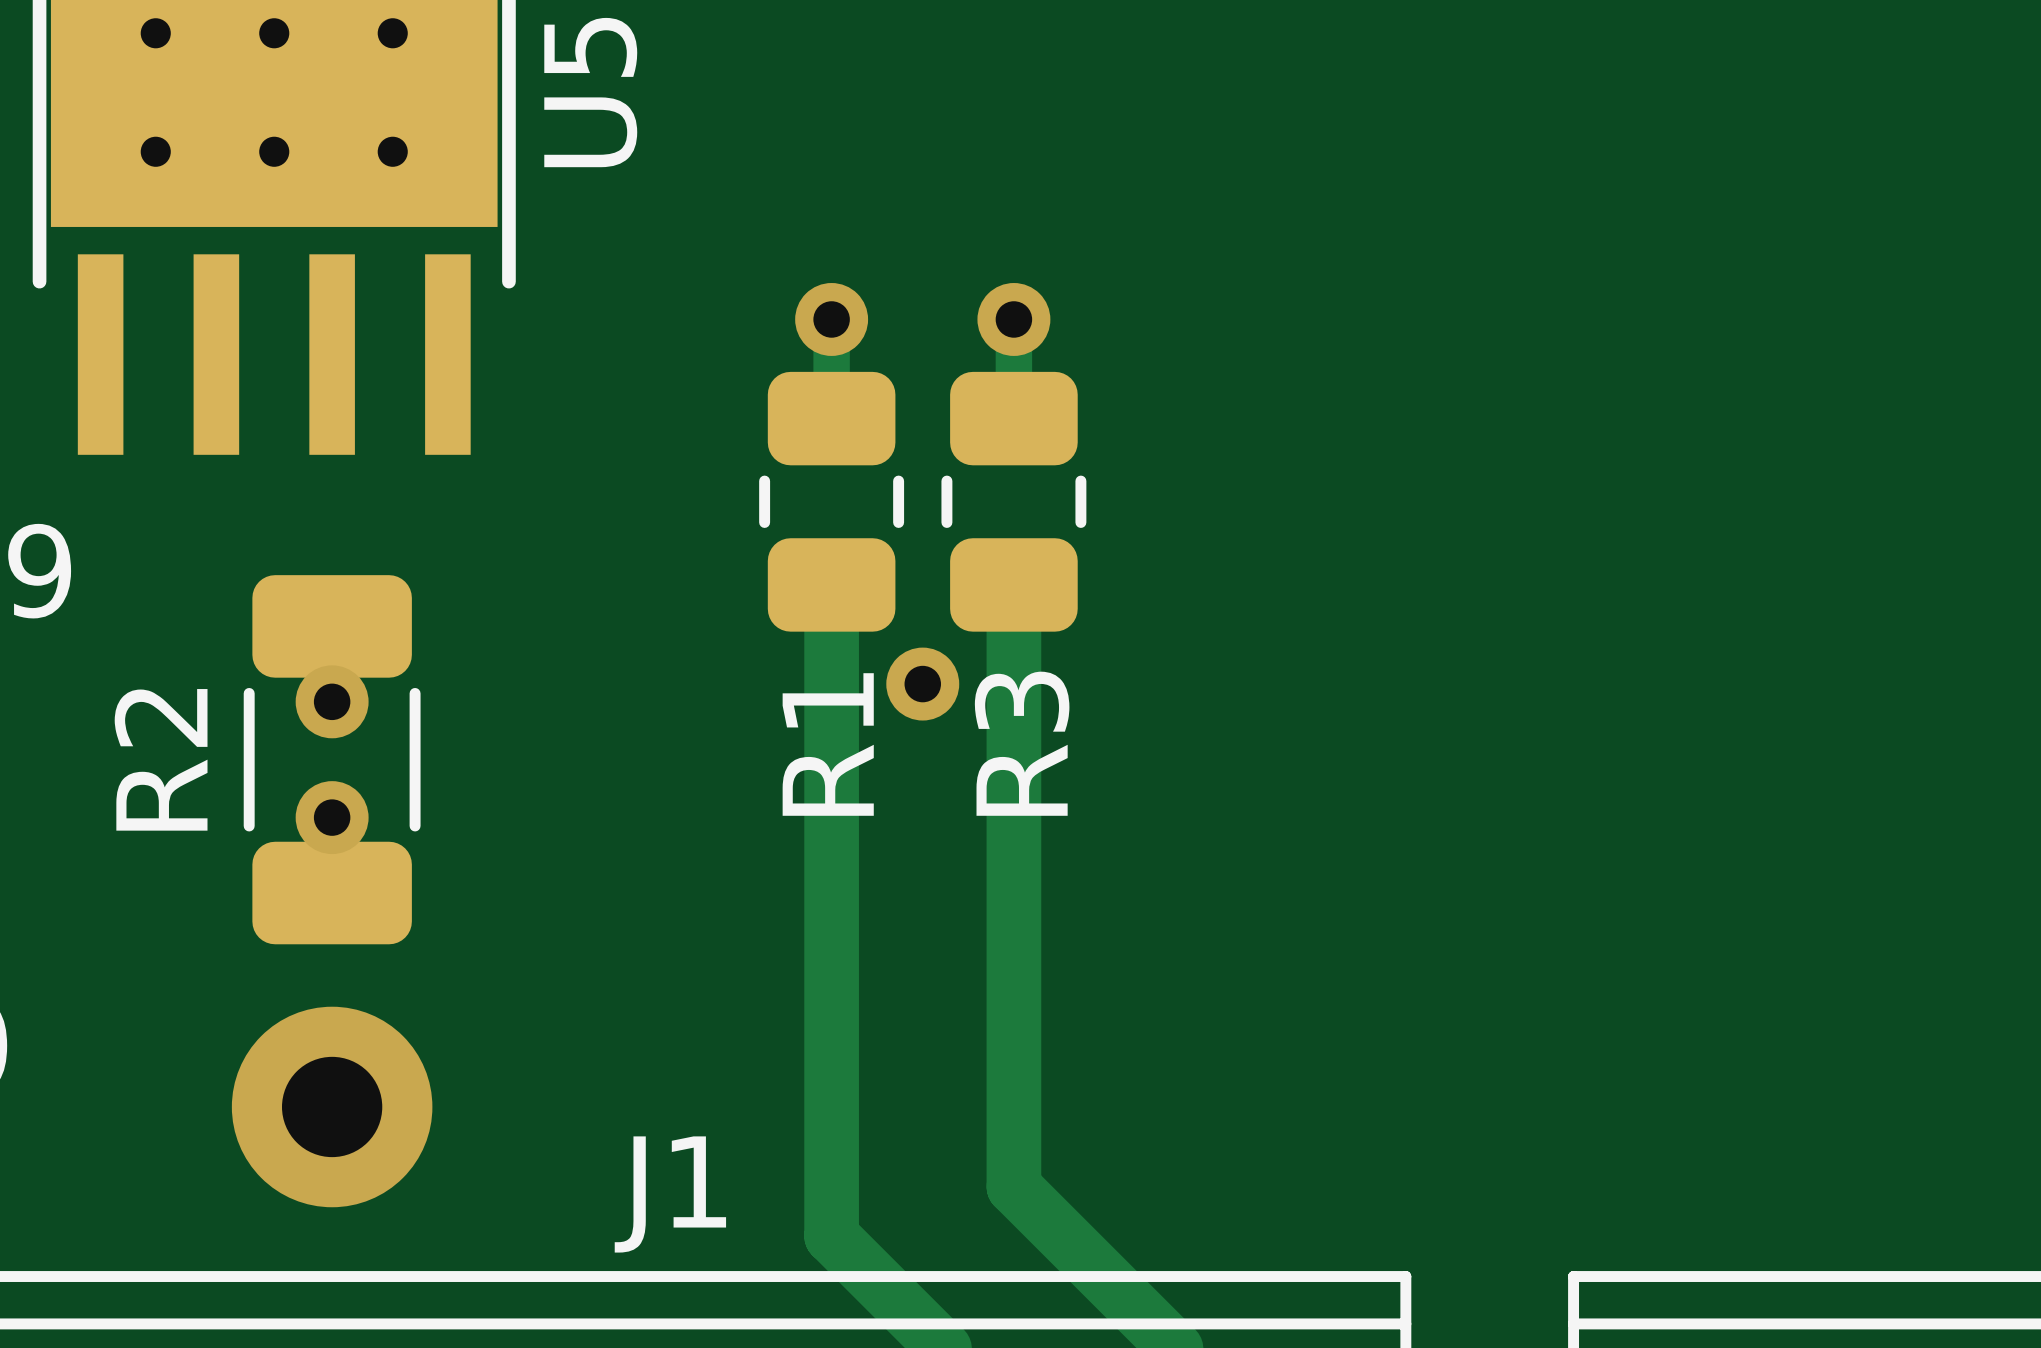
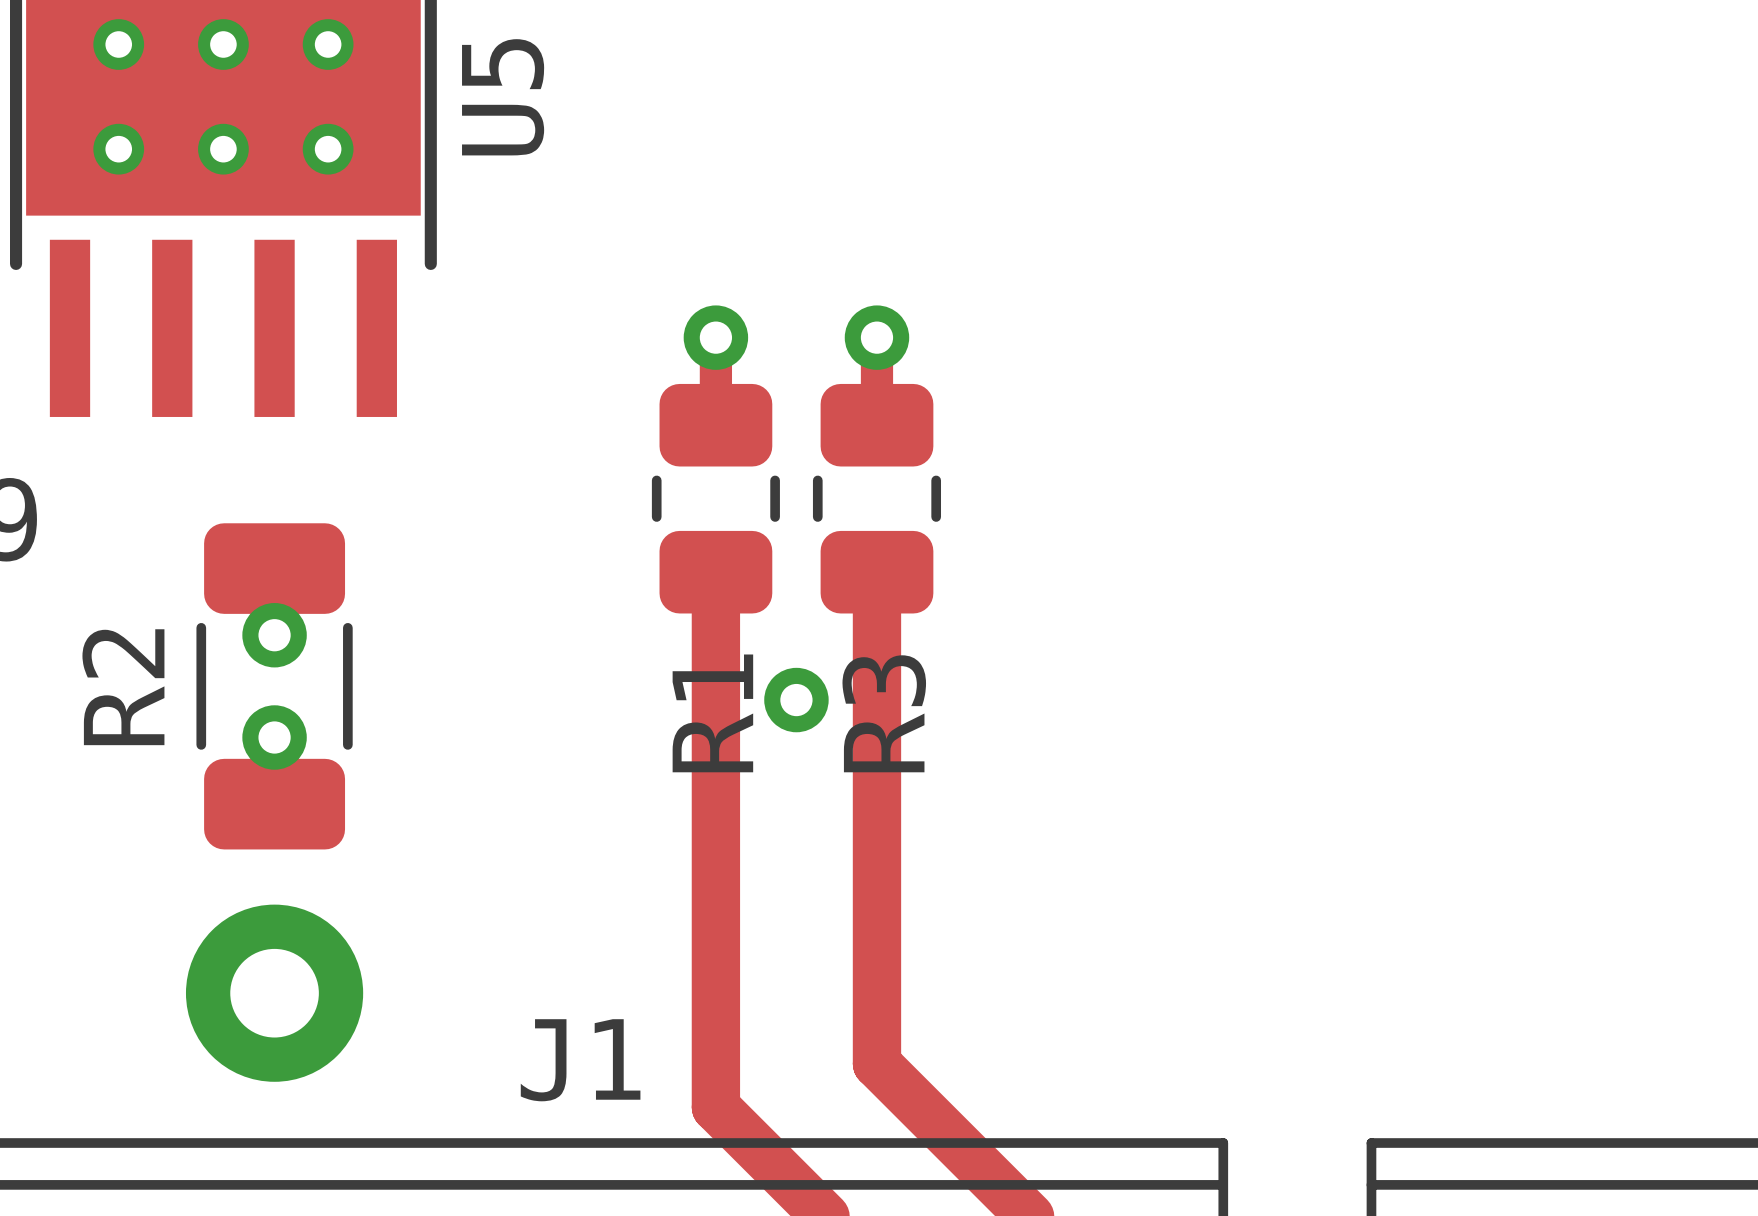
via position: (831, 319) -> (715, 337)
via position: (1013, 319) -> (876, 337)
R1 position: (831, 501) -> (715, 498)
R3 position: (1013, 501) -> (876, 498)
via position: (922, 684) -> (796, 700)

